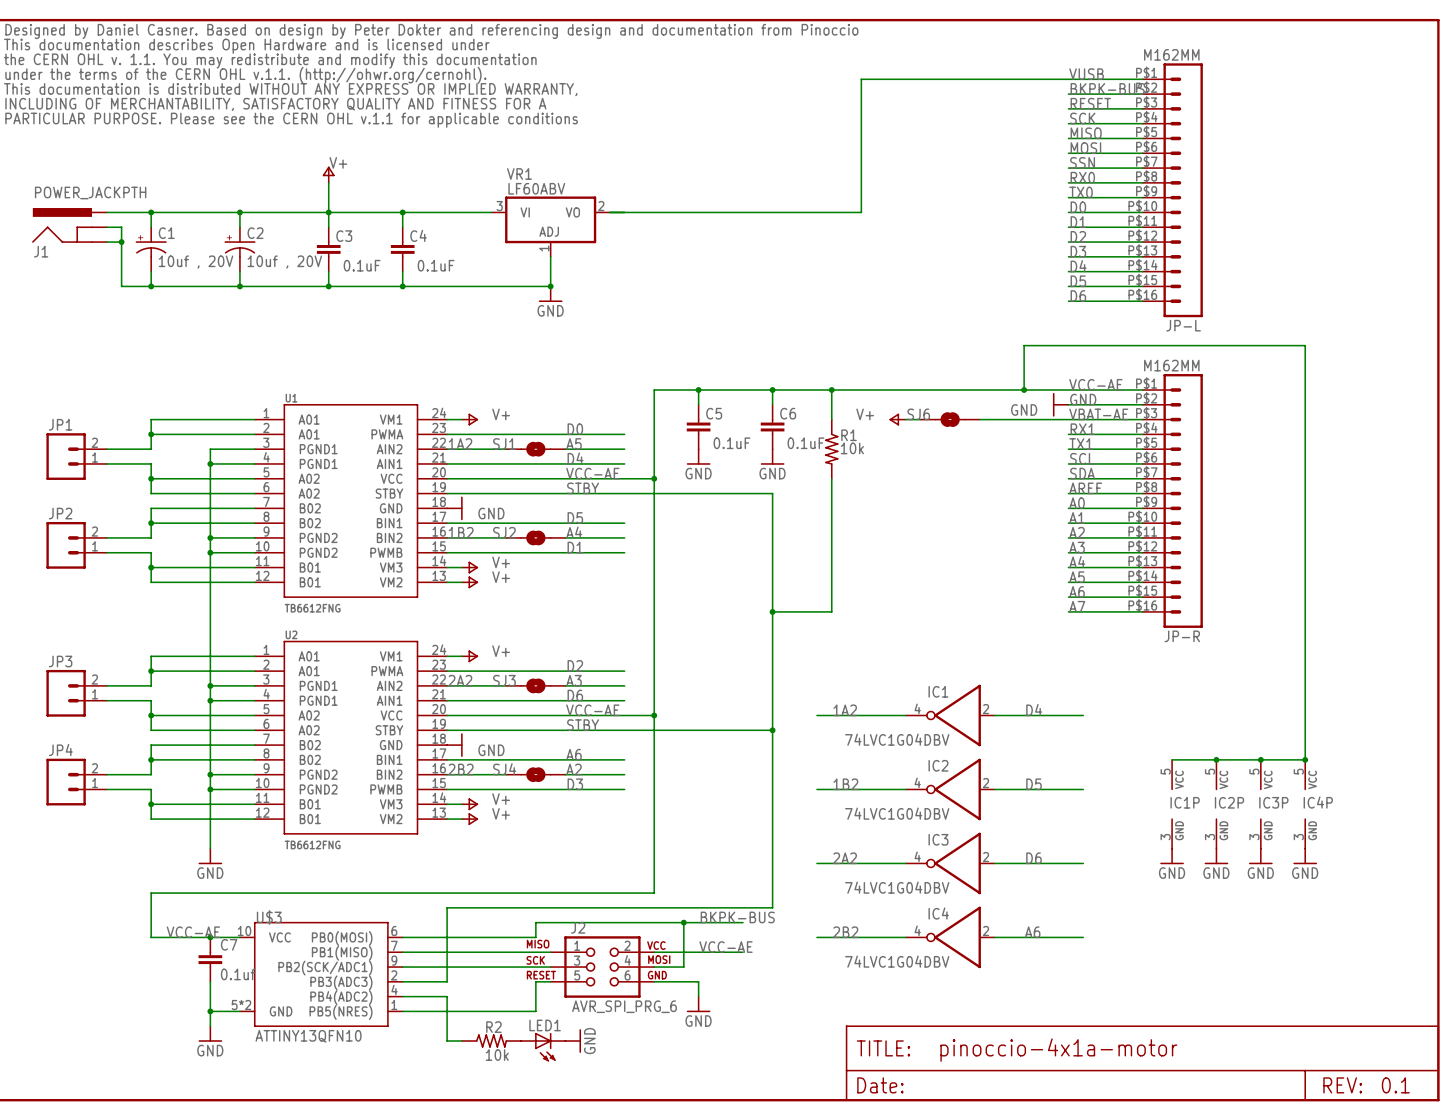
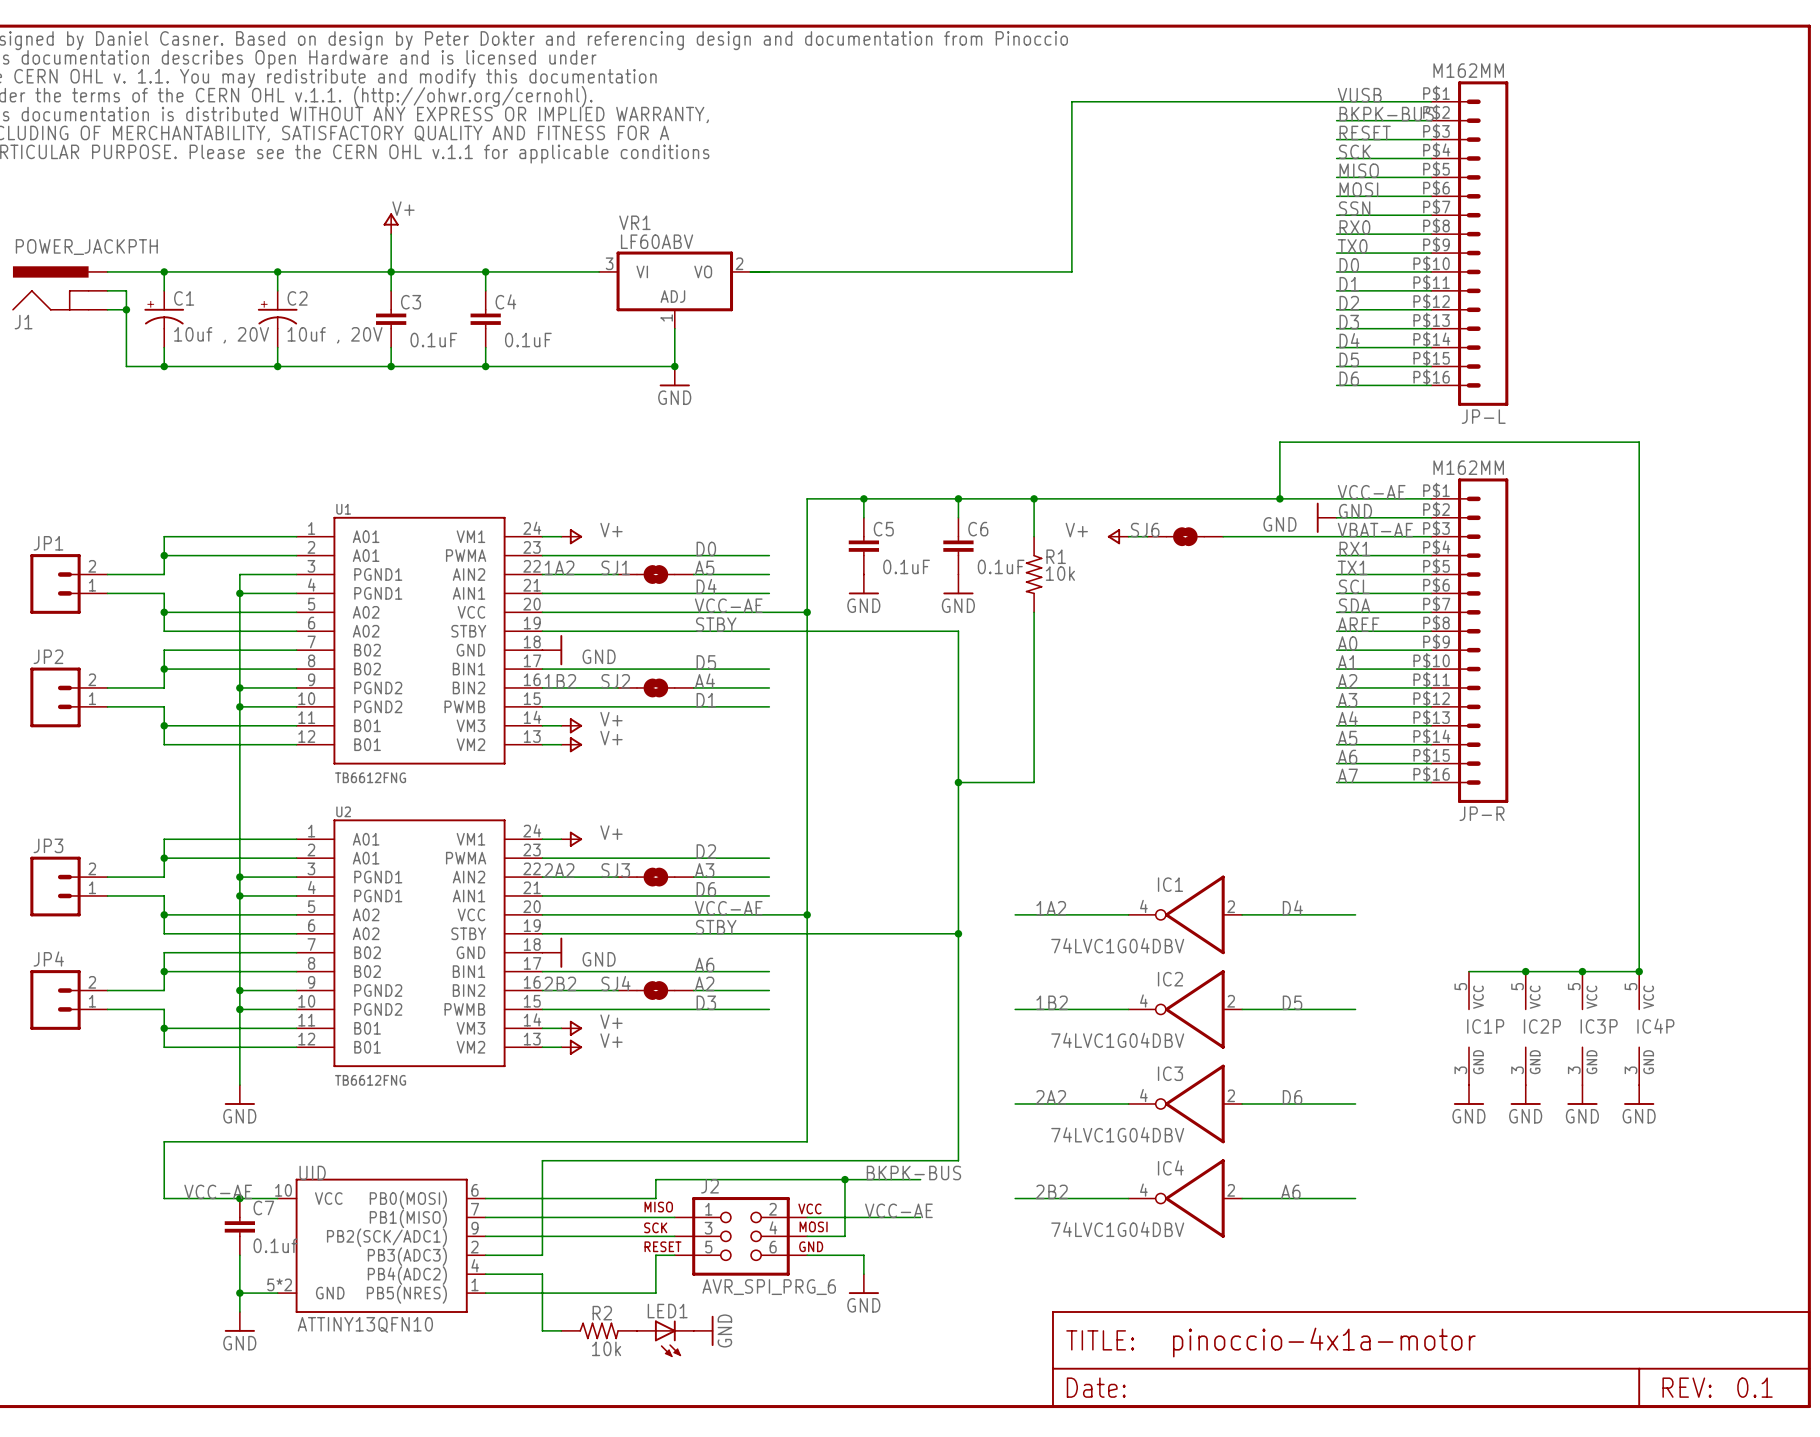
U$3 name: U$3 (269, 917) -> UID (312, 1173)

